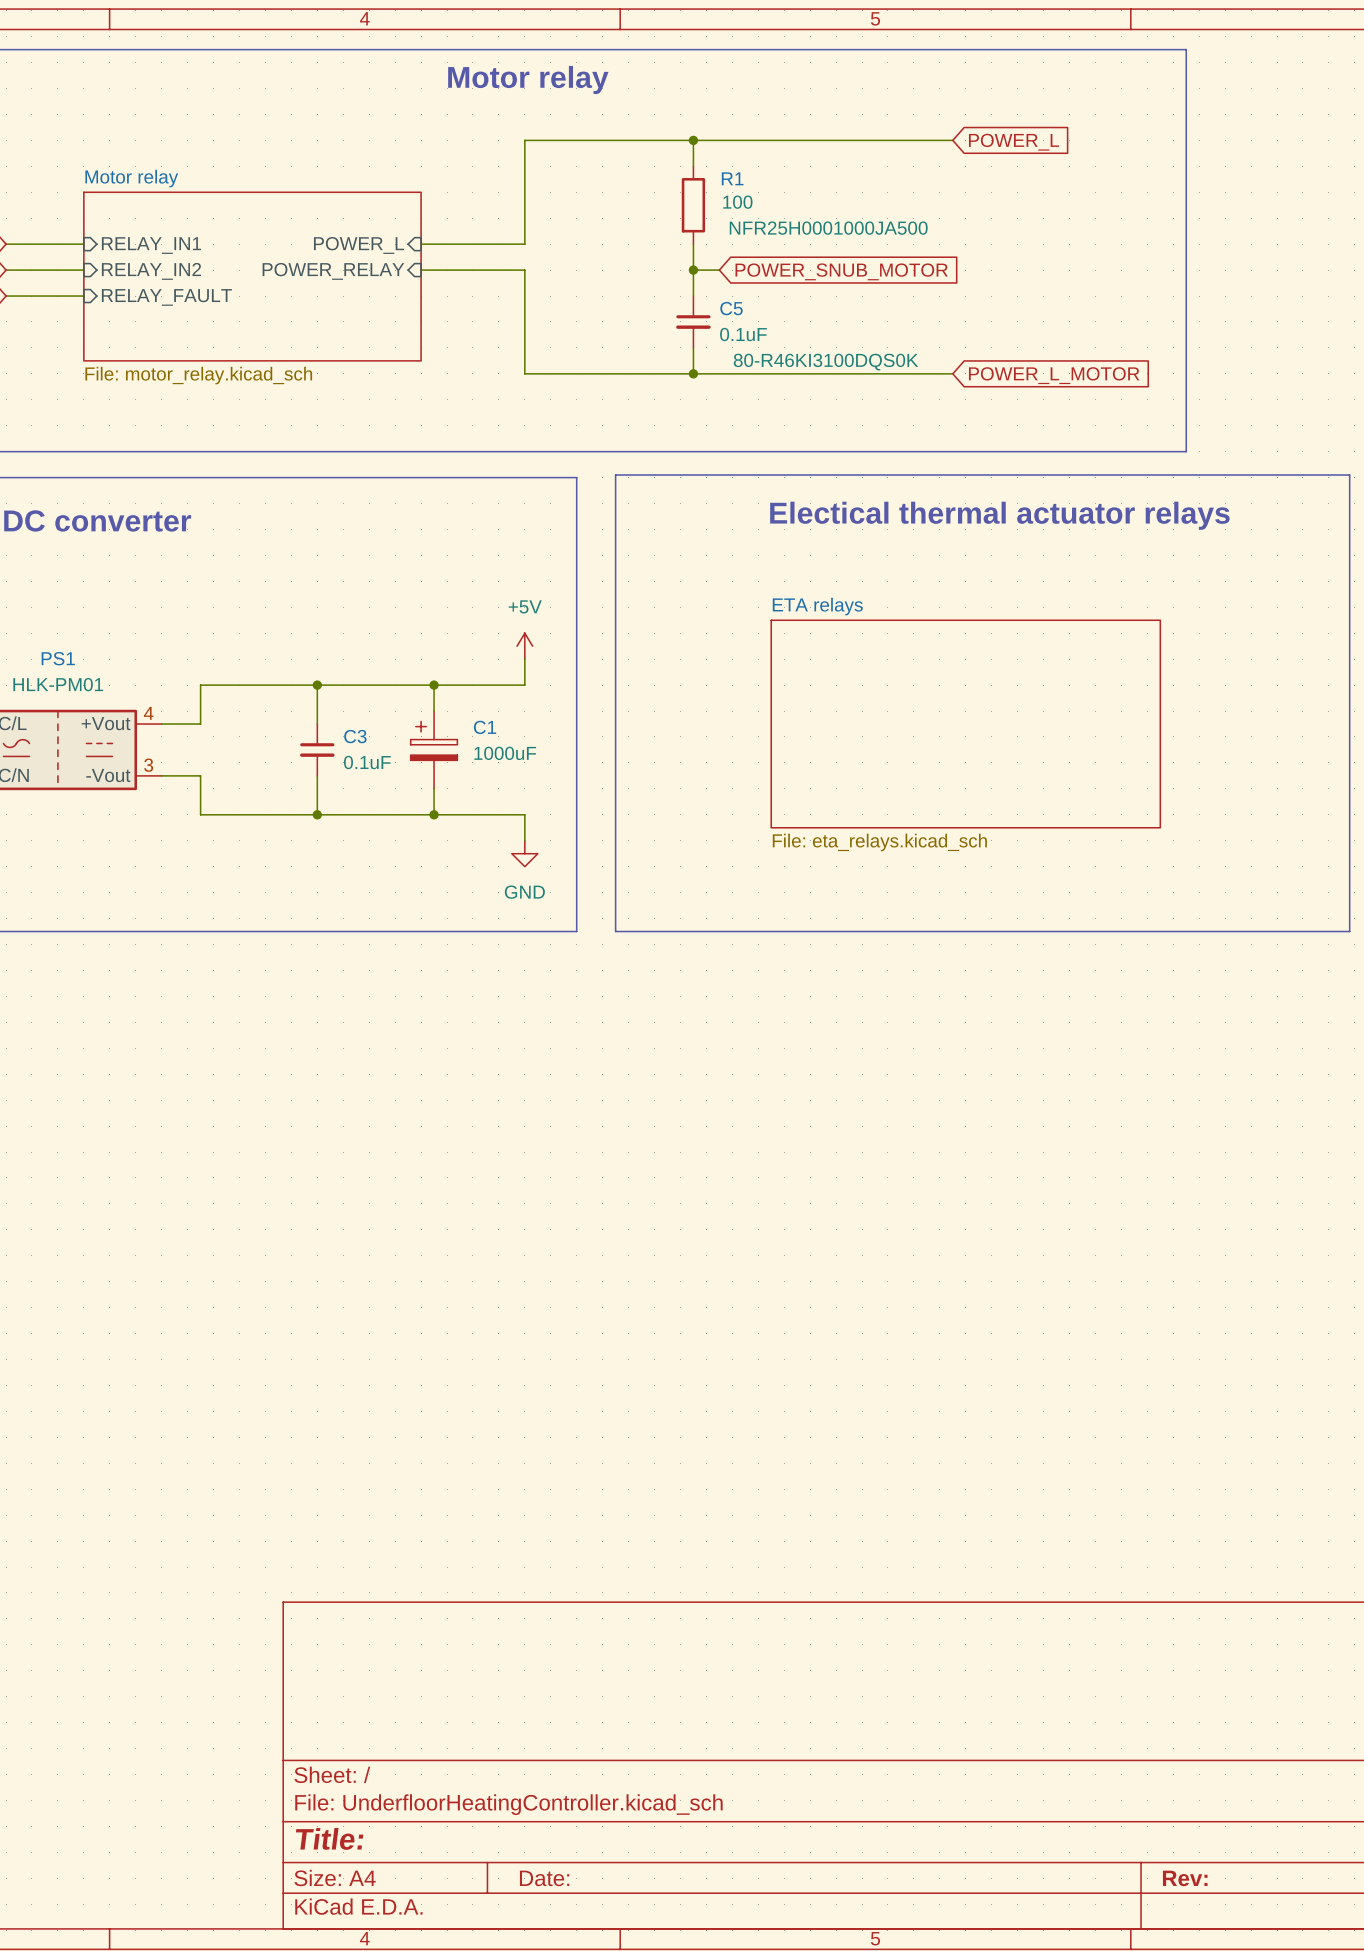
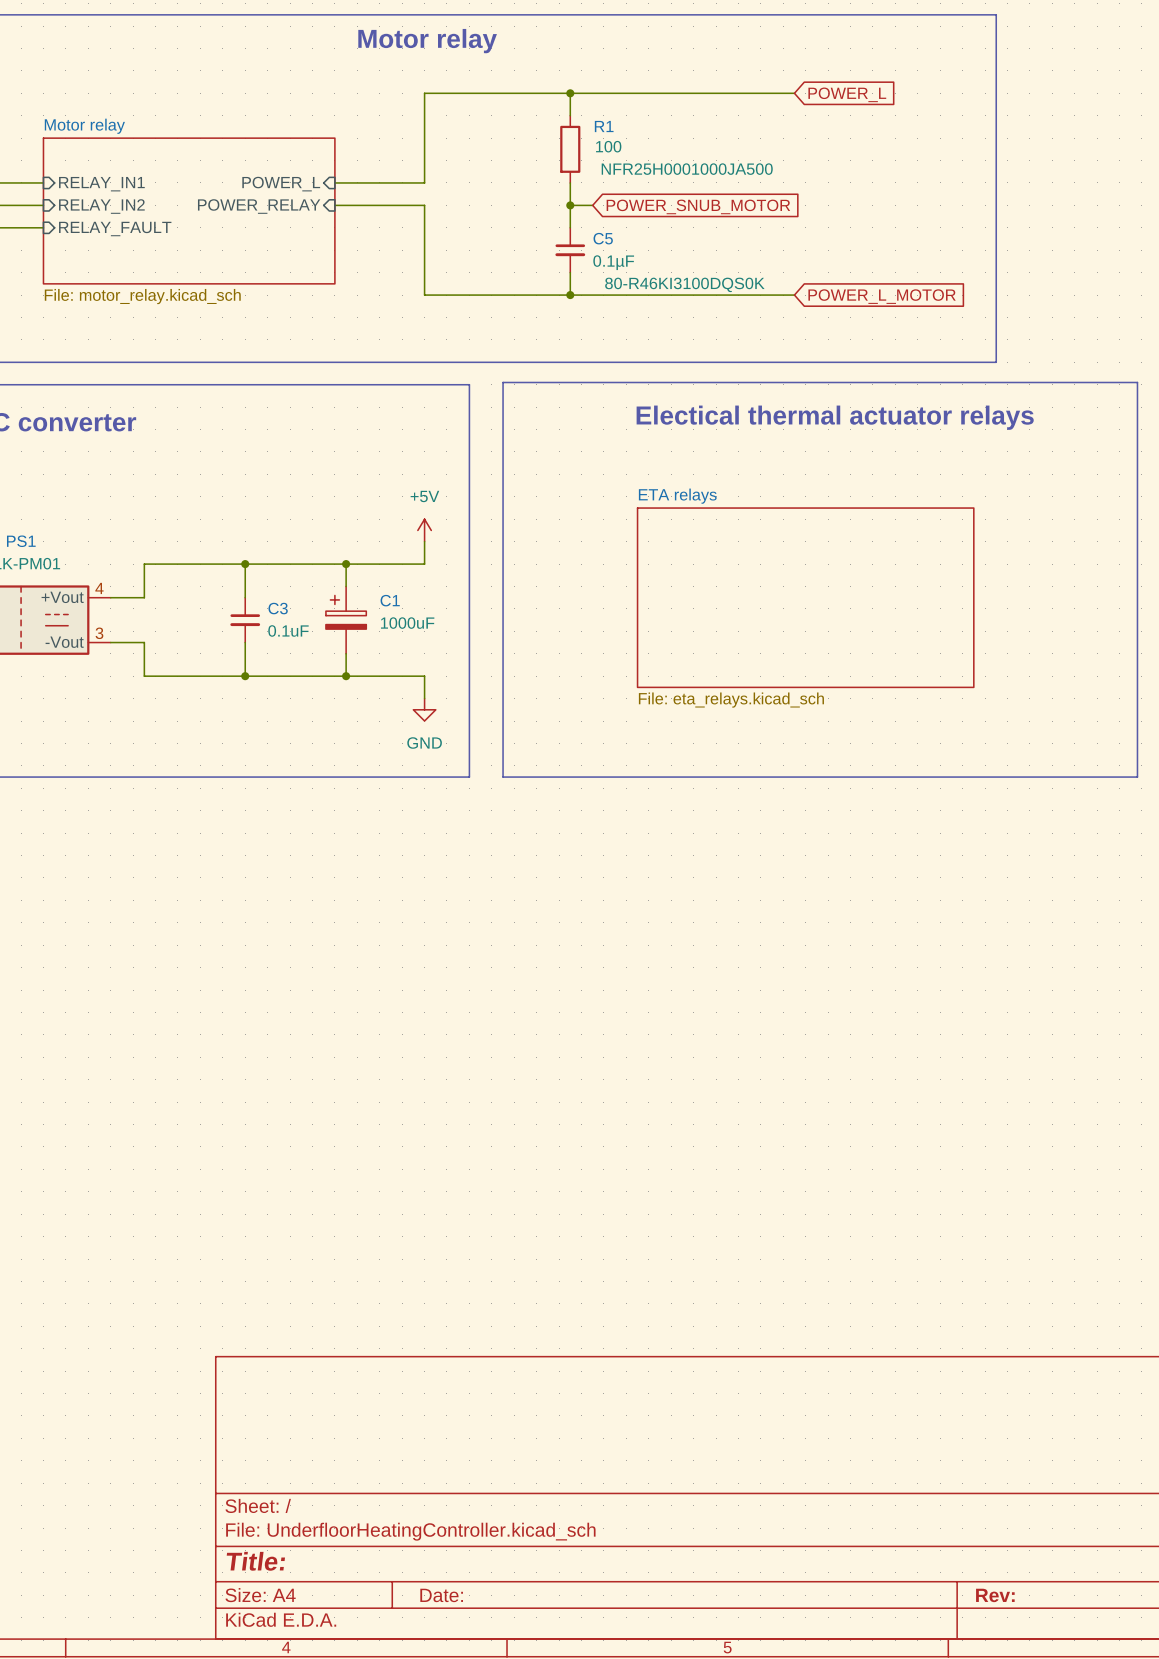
C5 value: 0.1uF (743, 334) -> 0.1µF (613, 262)

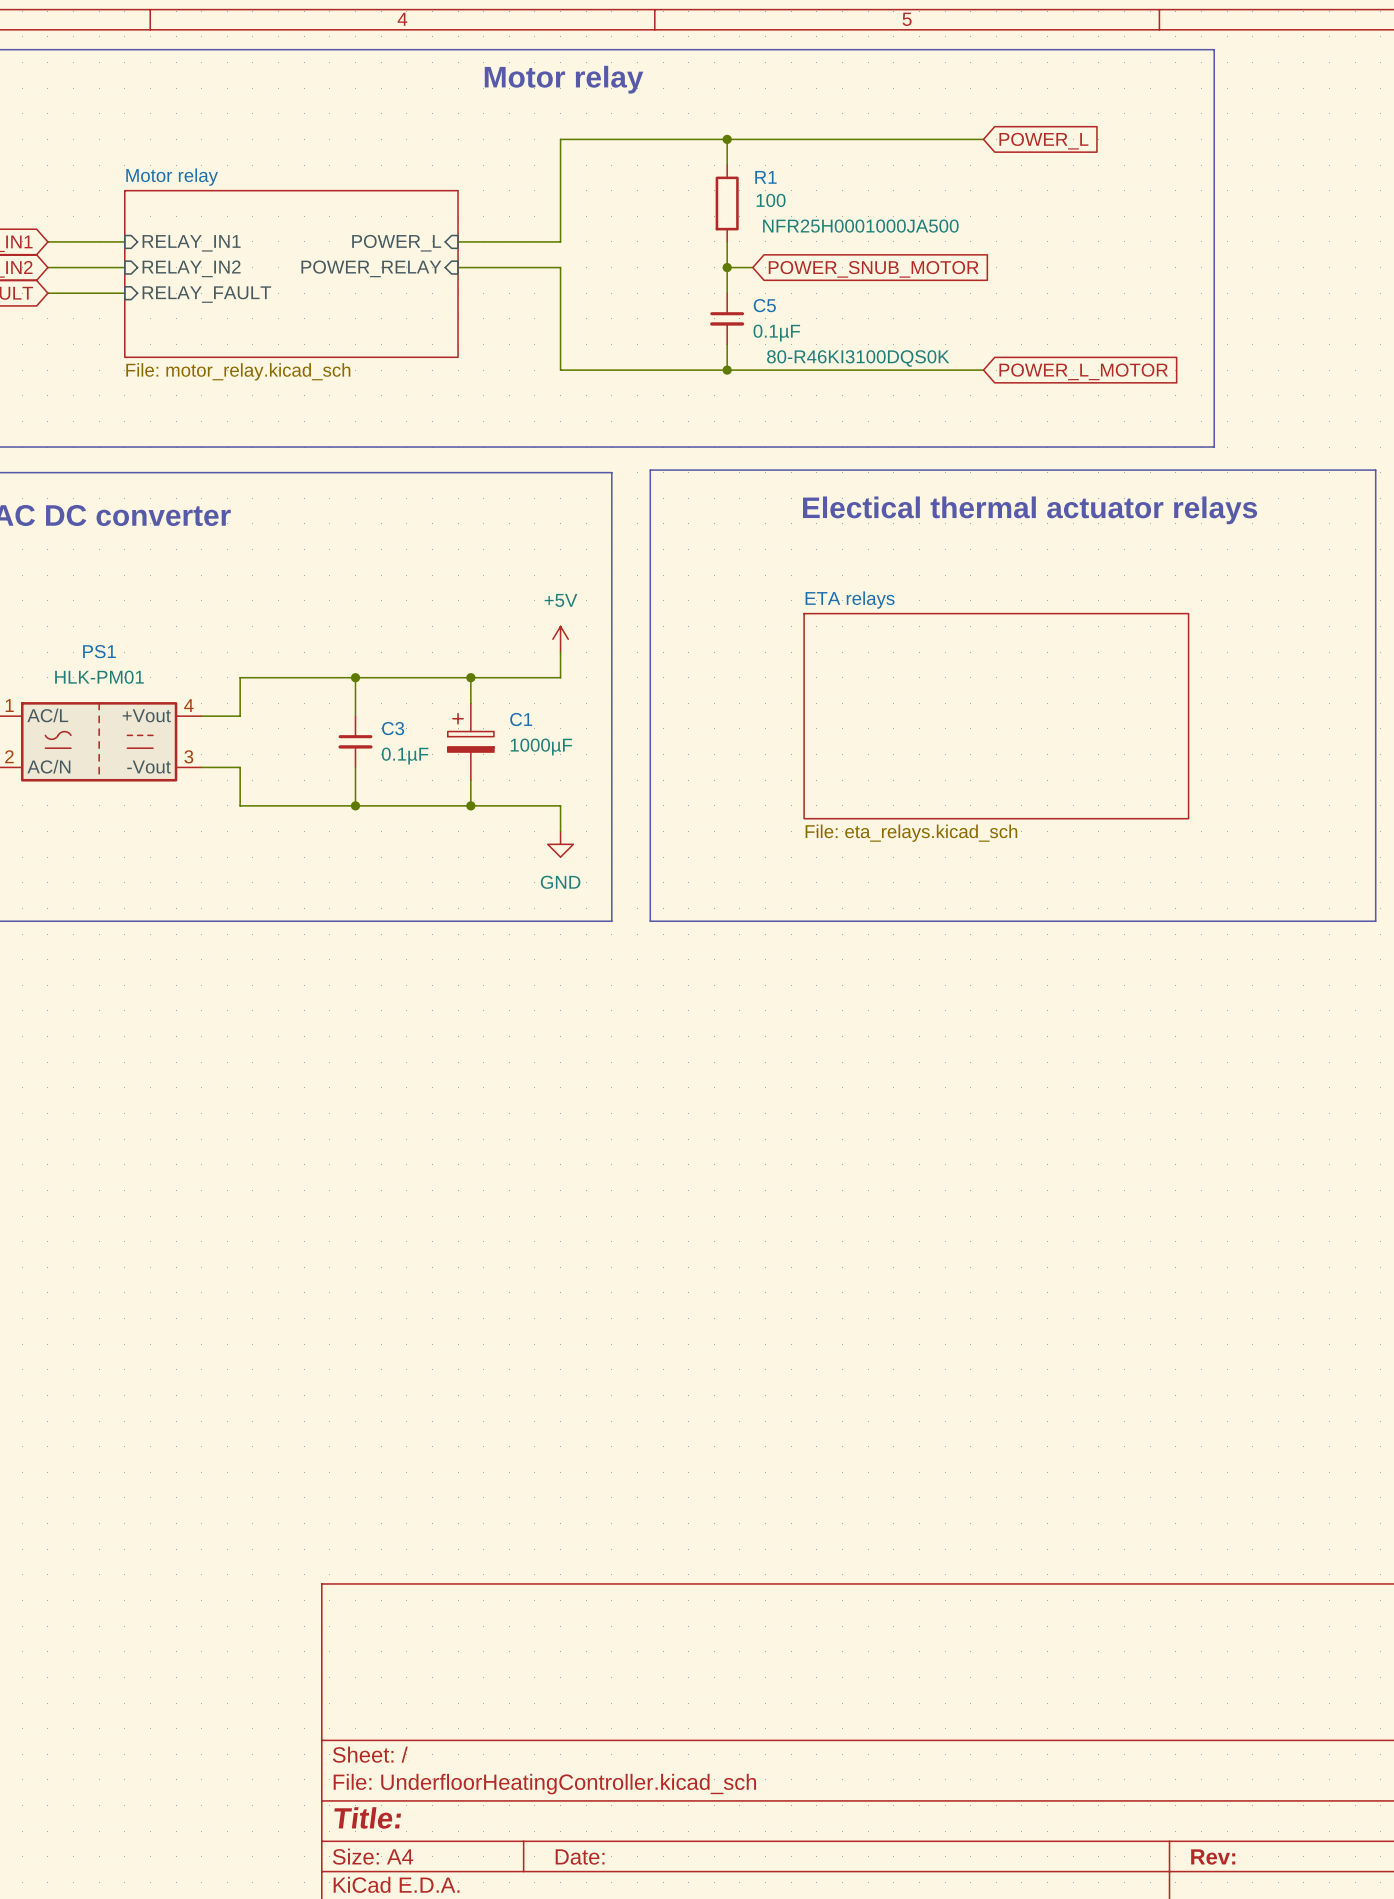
C1 value: 1000uF (407, 623) -> 1000µF (541, 746)
C3 value: 0.1uF (288, 630) -> 0.1µF (405, 756)

